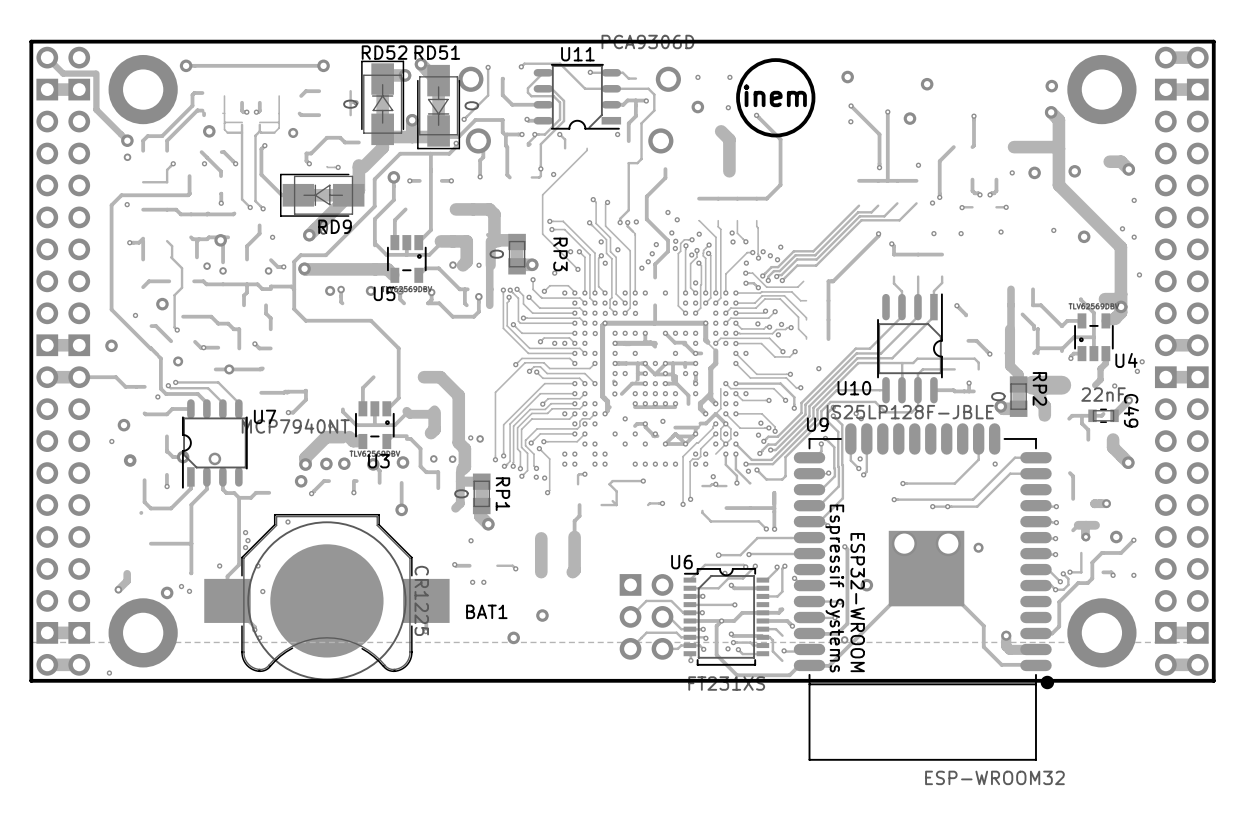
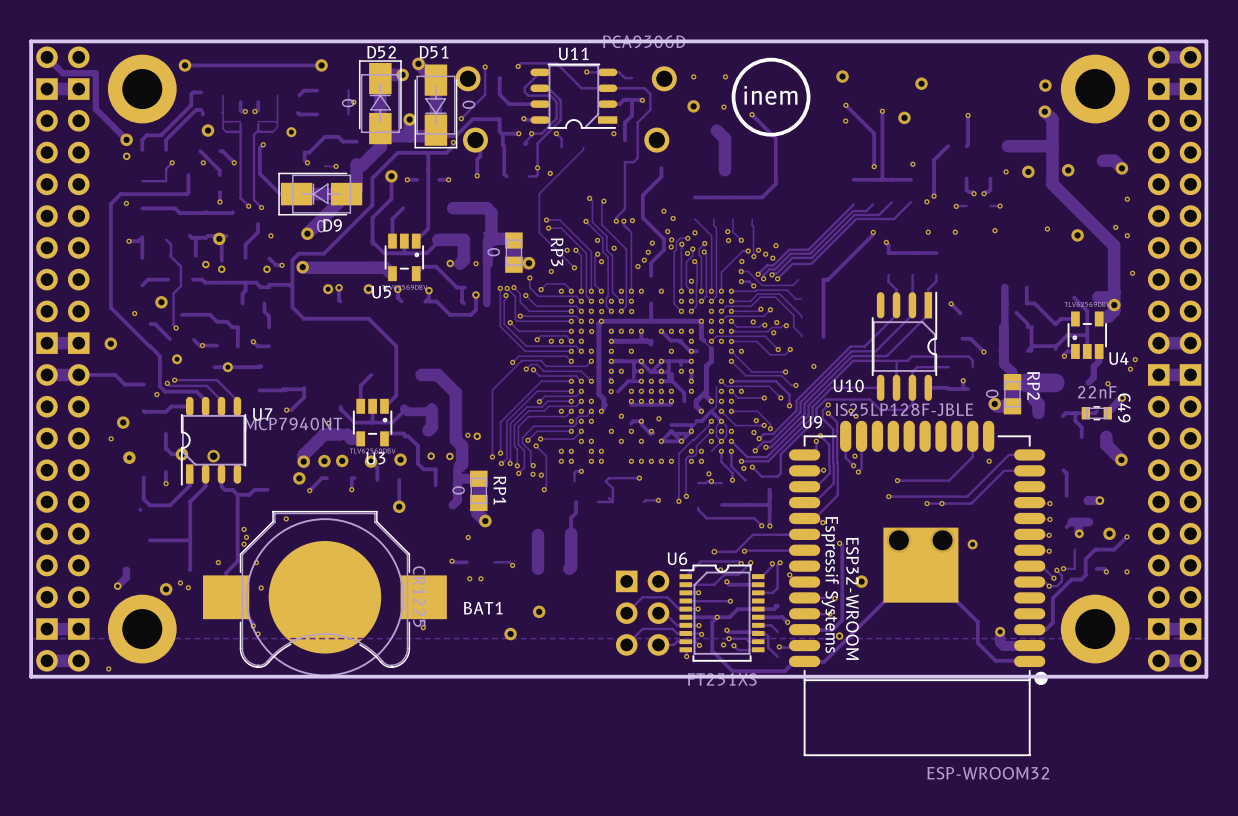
RD52 name: RD52 (384, 52) -> D52 (381, 52)
RD51 name: RD51 (437, 52) -> D51 (434, 52)
RD9 name: RD9 (335, 226) -> D9 (332, 225)

